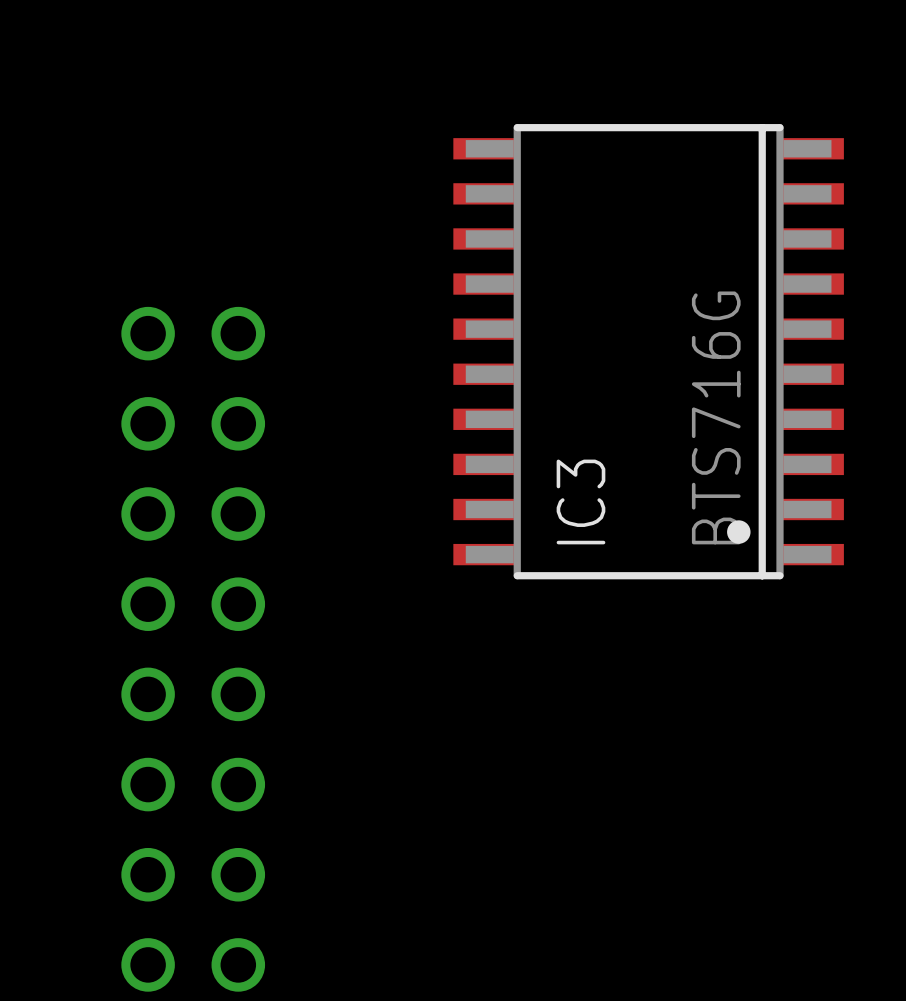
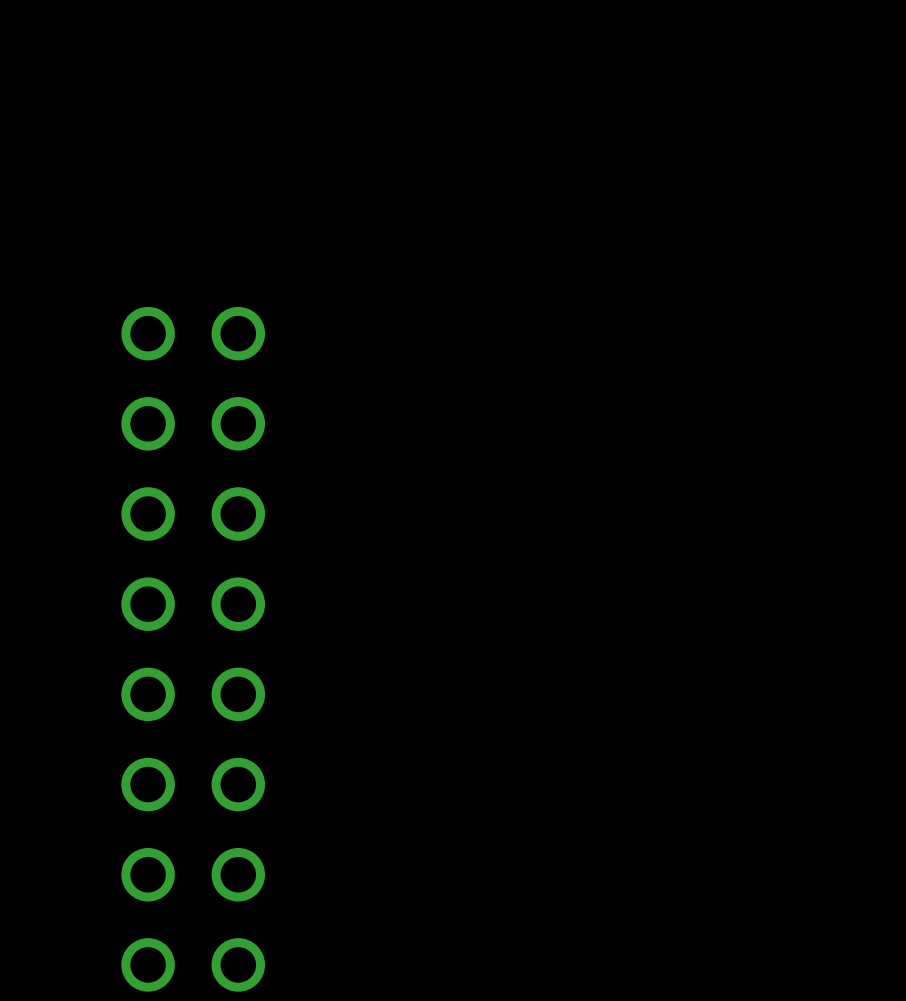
IC3: BTS716G (648, 351) -> none

